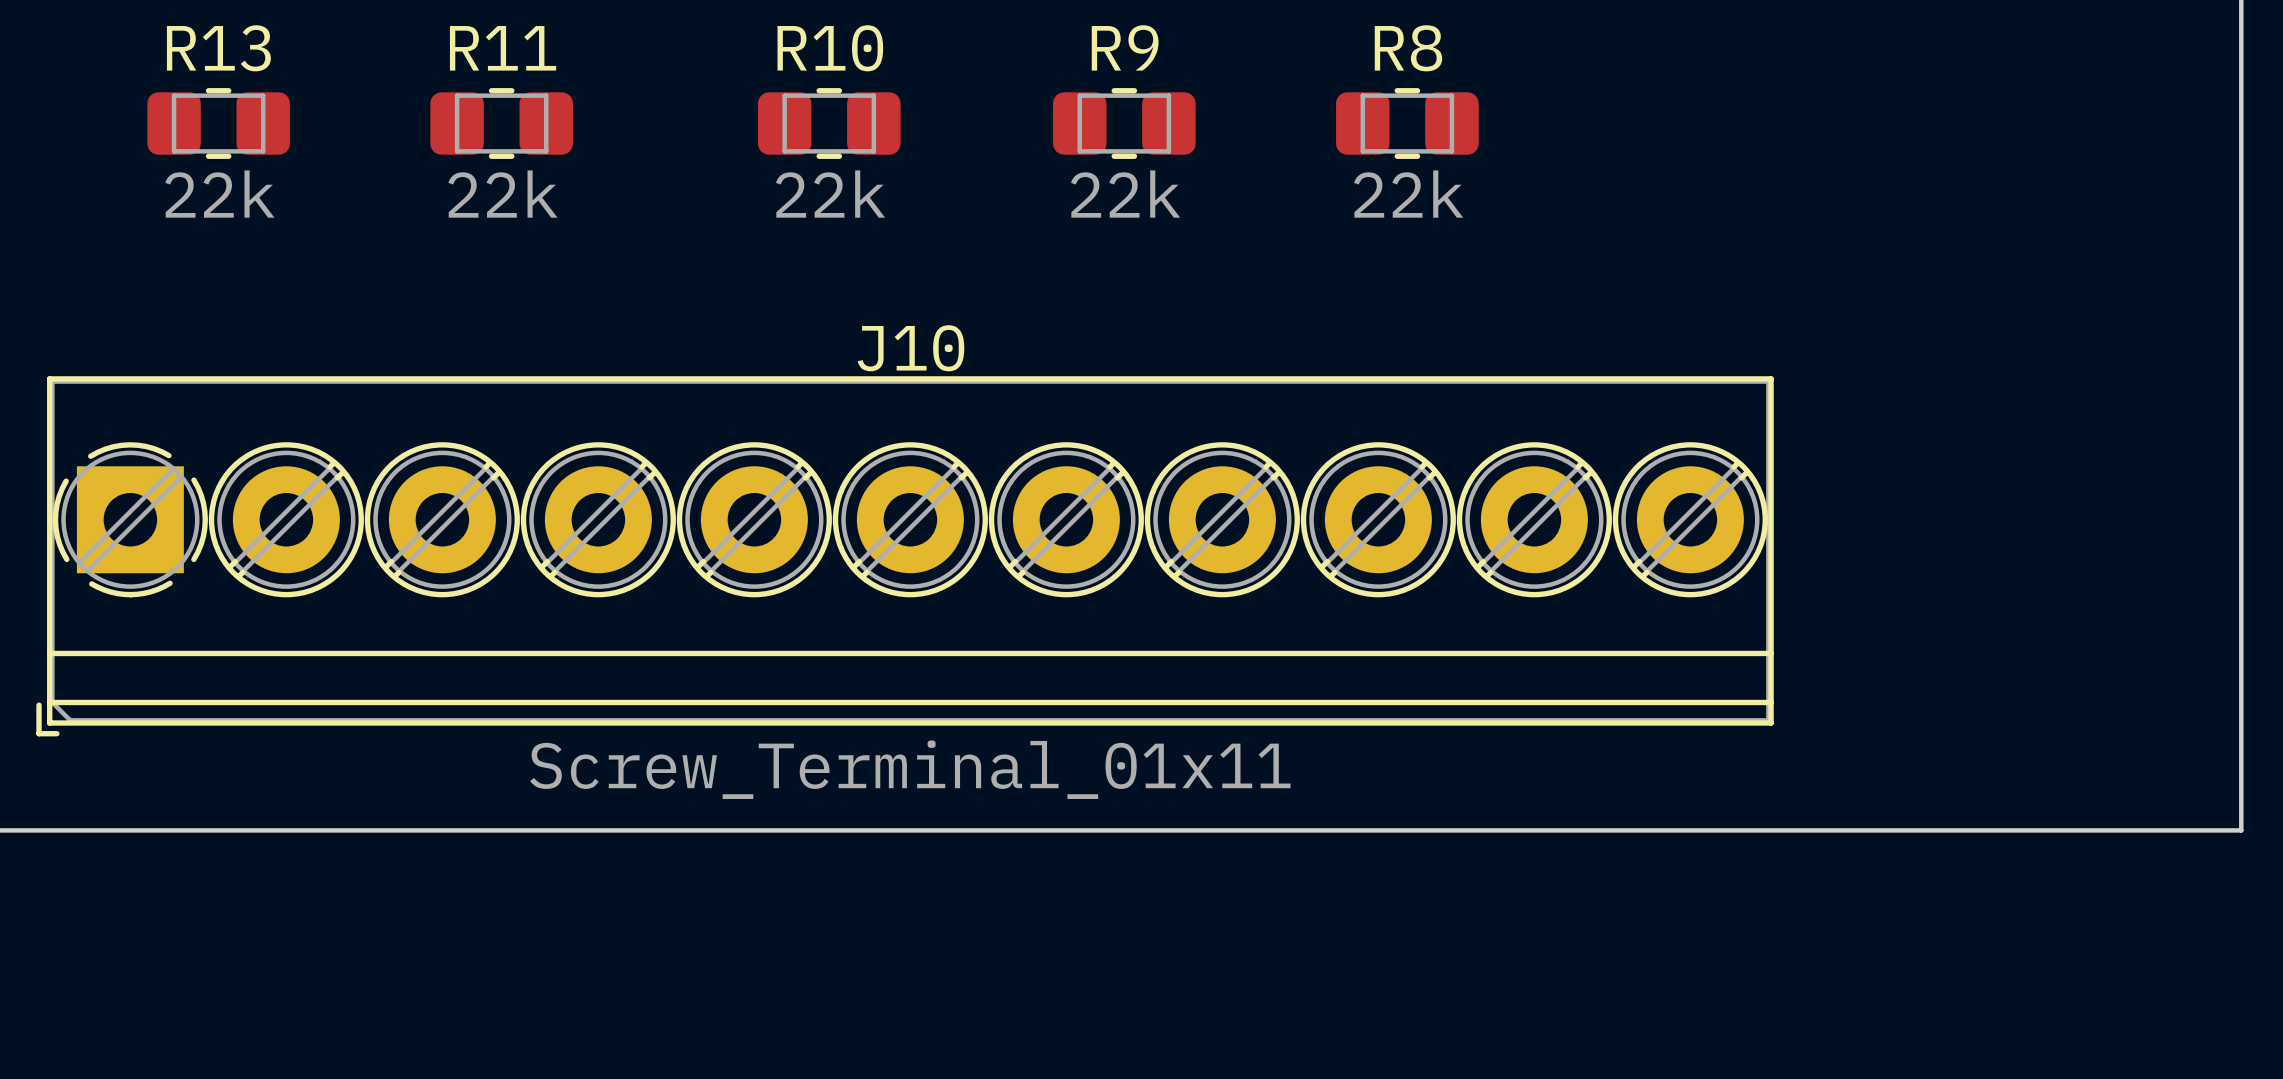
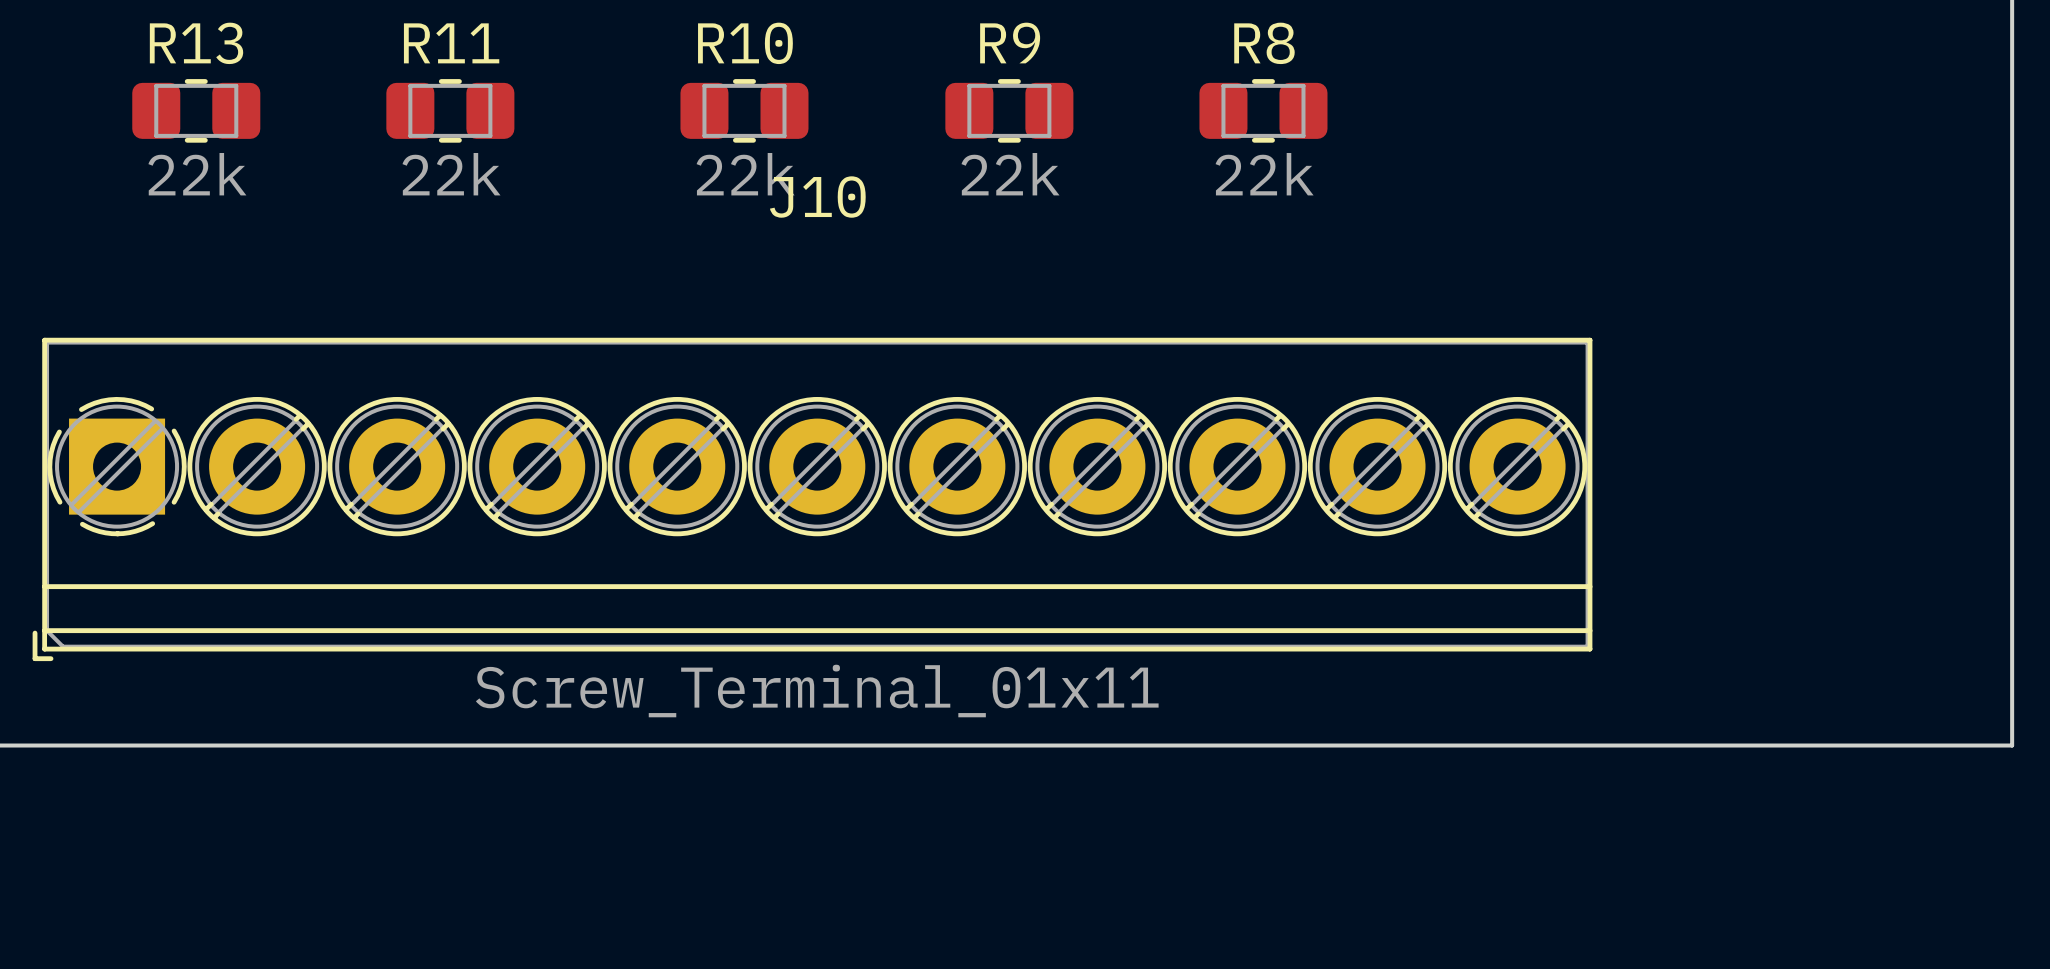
J10 name position: J10 (910, 348) -> J10 (817, 197)

